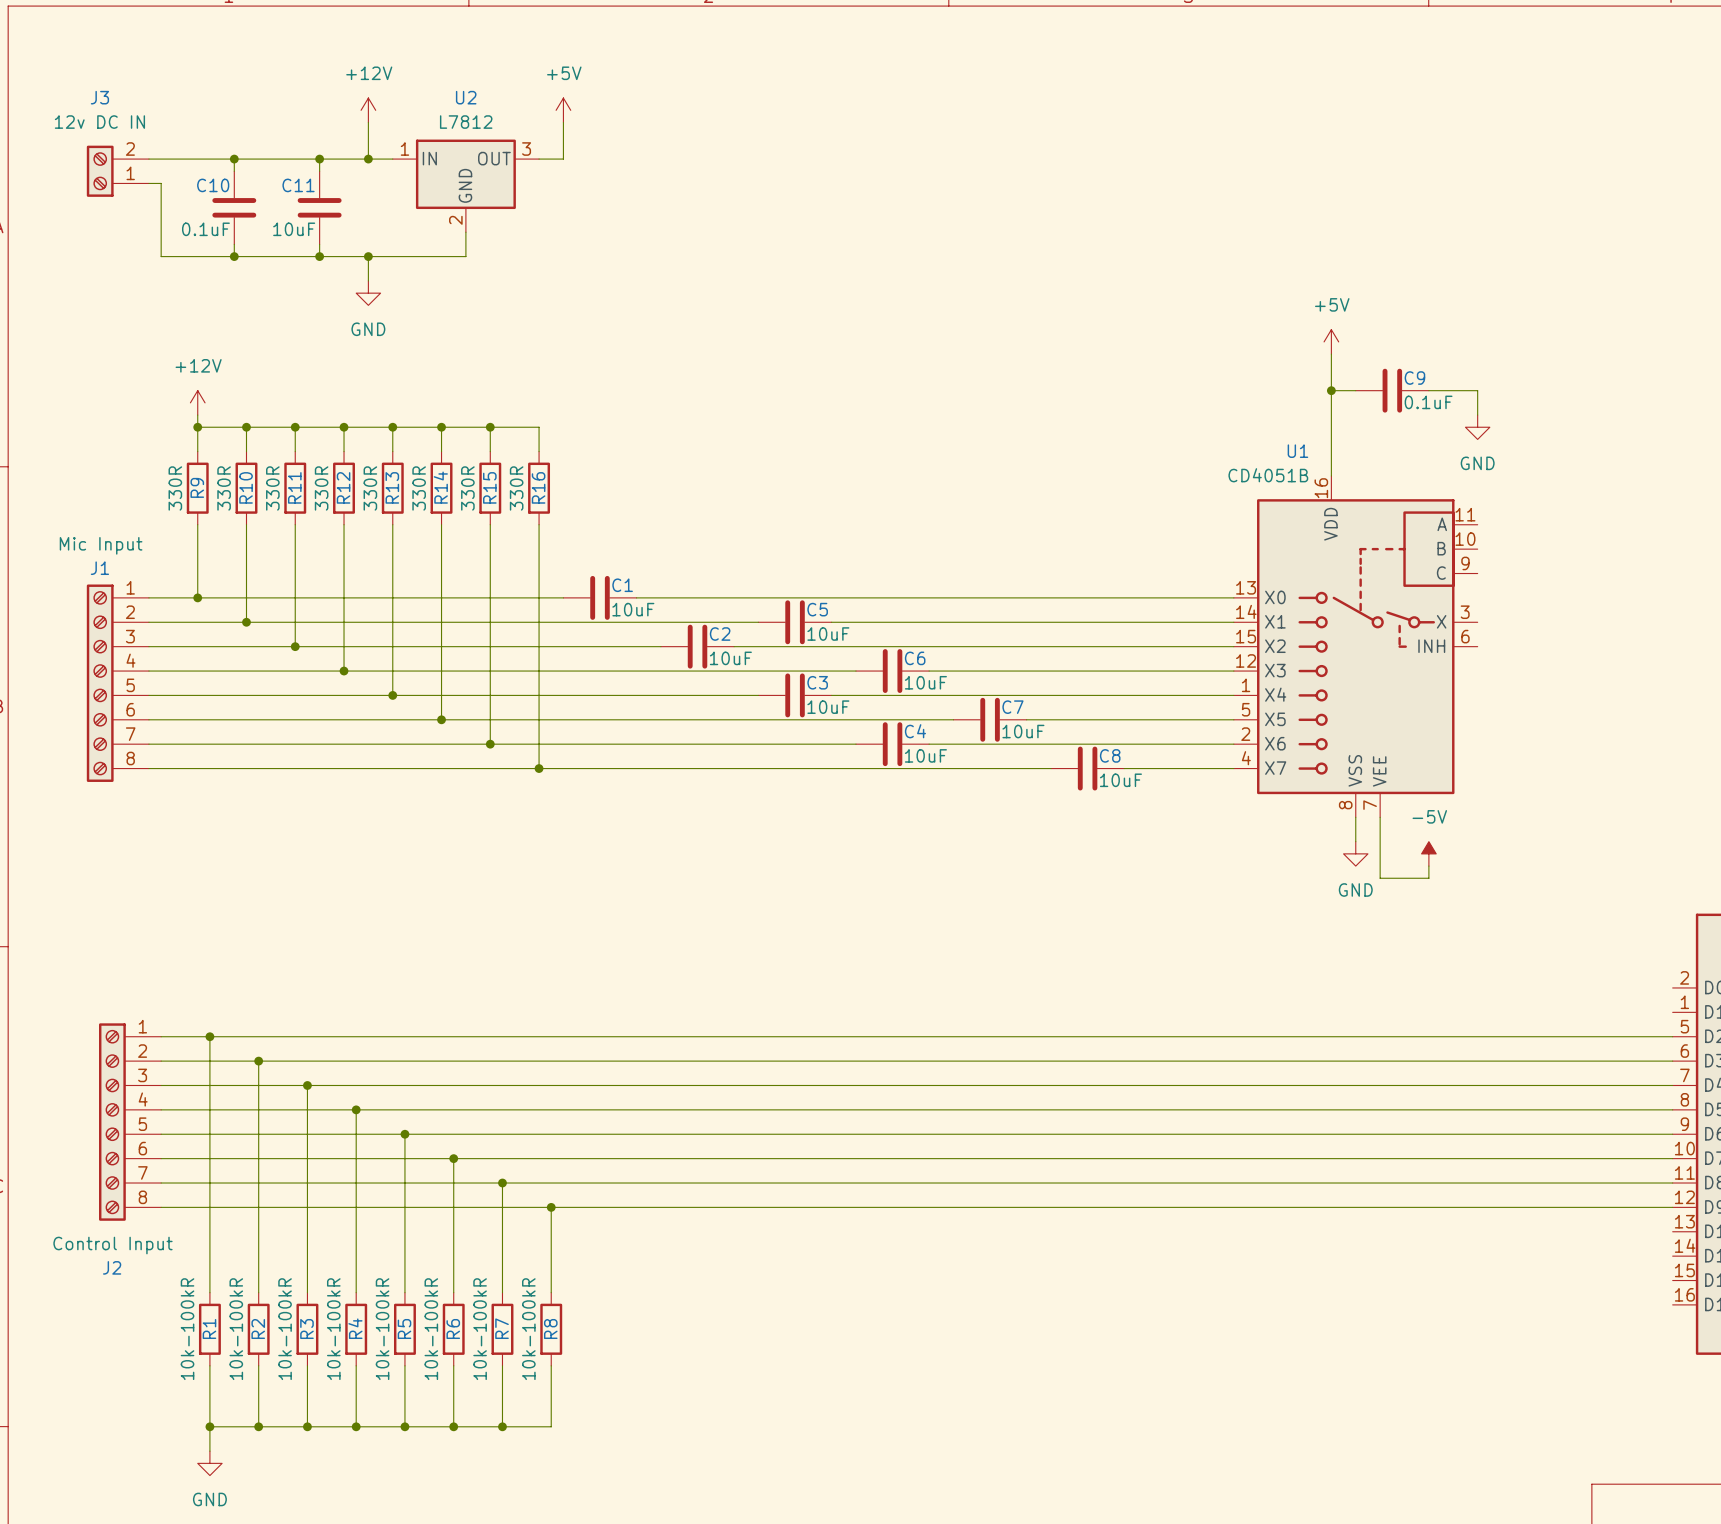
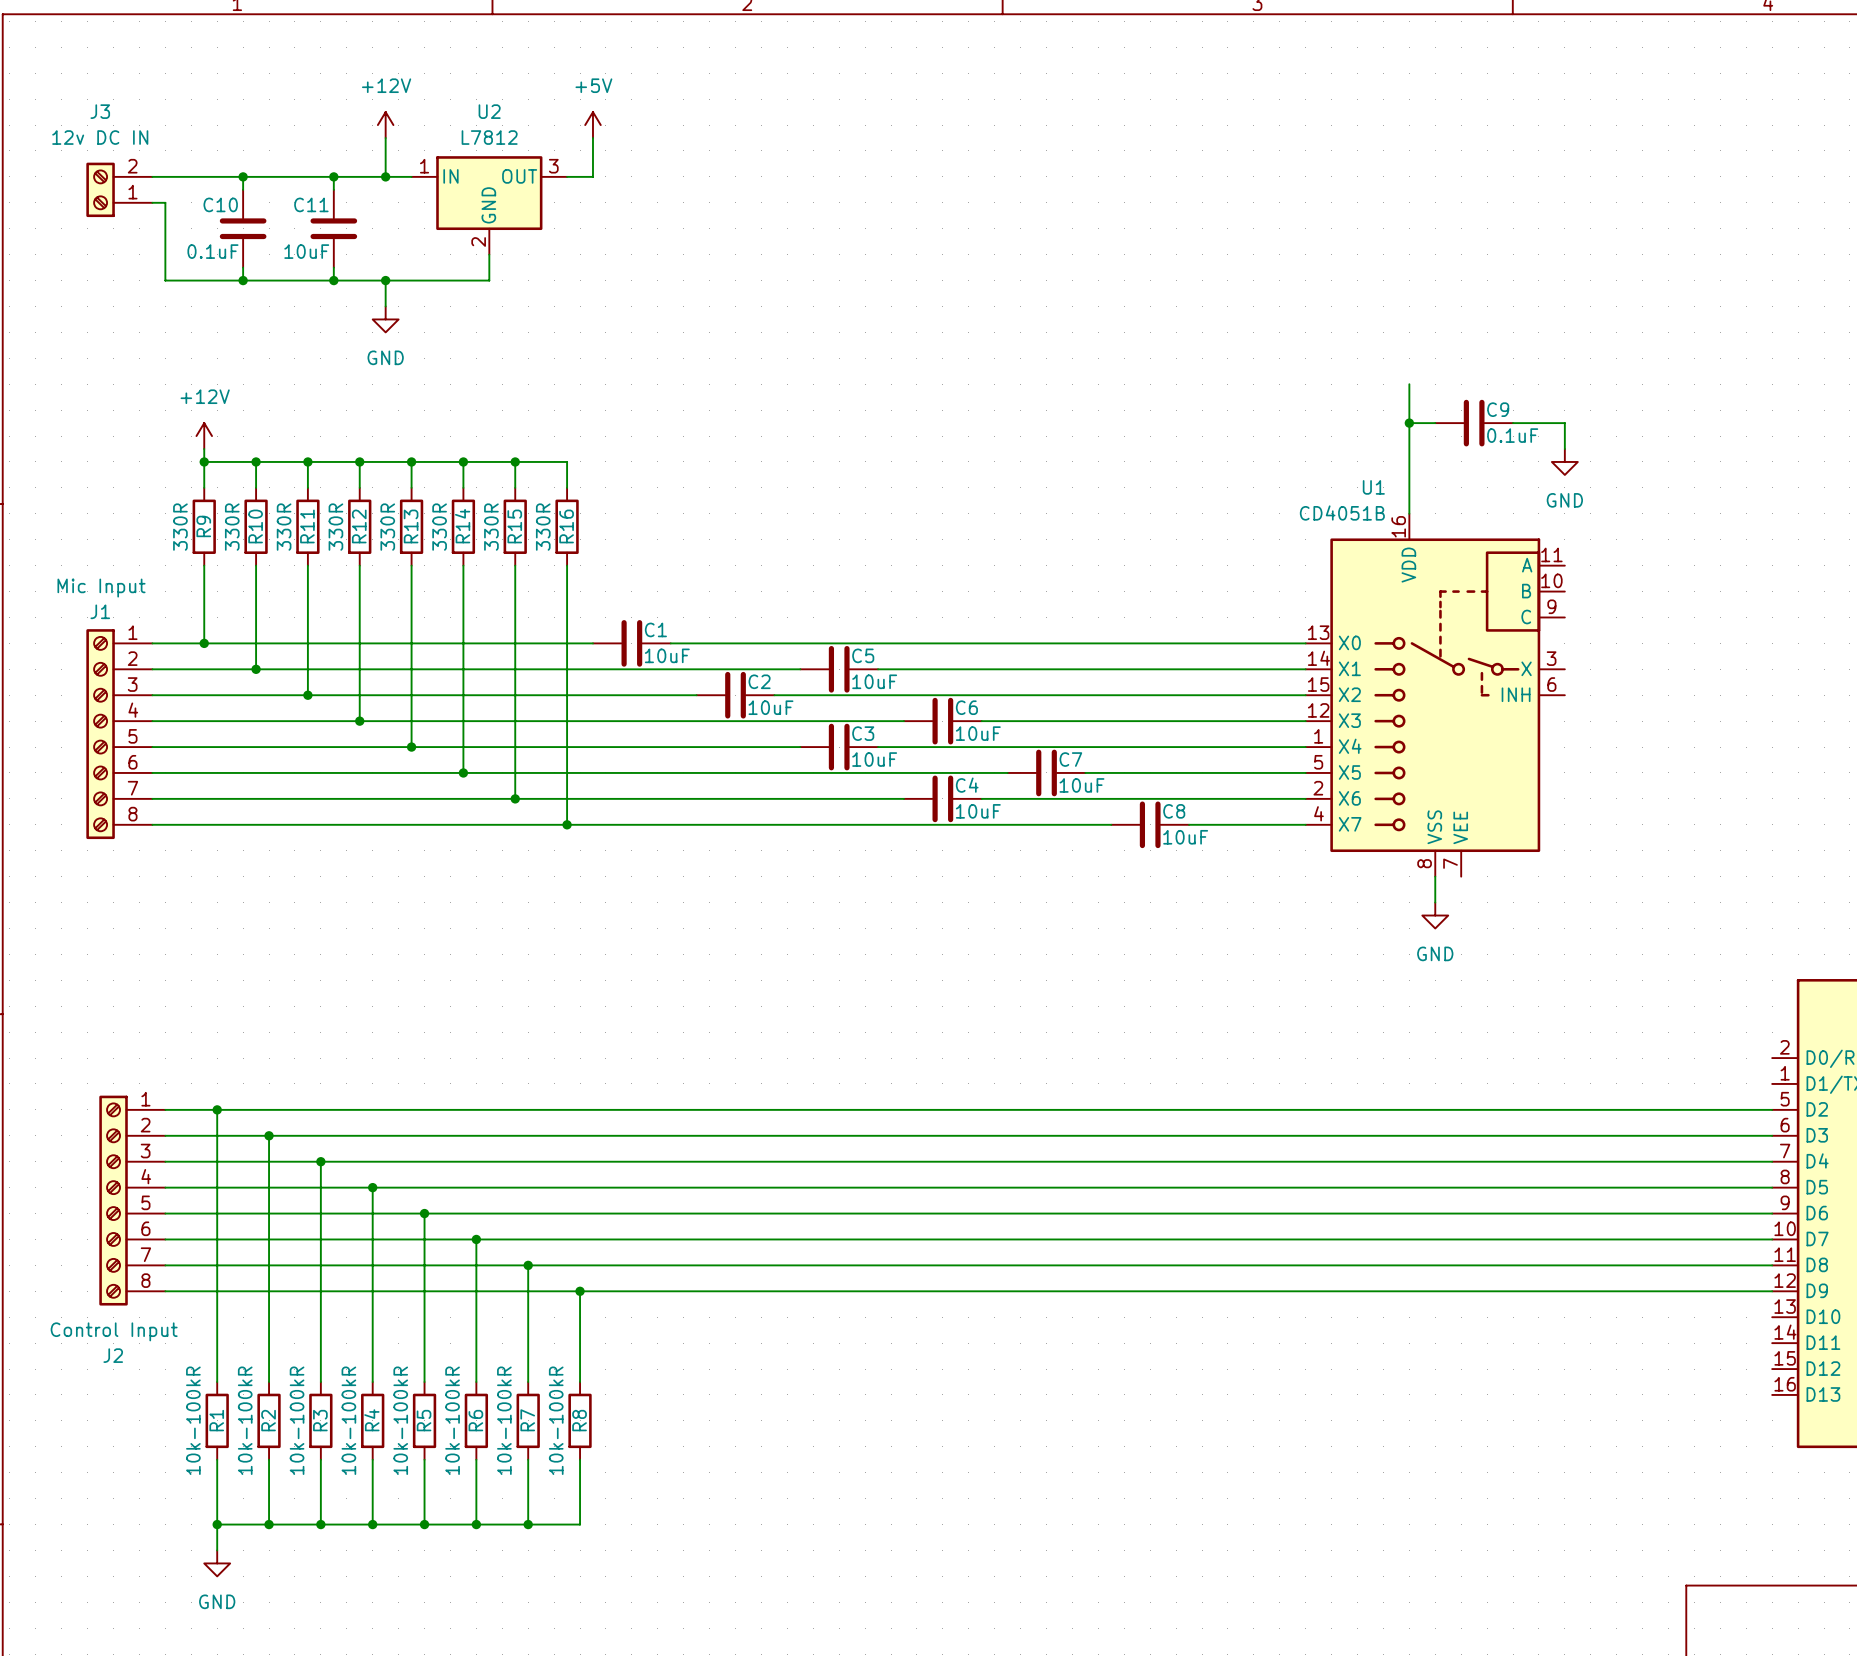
power symbol: +5V (1331, 341) -> none
wire: (1380, 817) (1380, 878) (1428, 878) (1428, 866) -> none
power symbol: -5V (1428, 853) -> none

